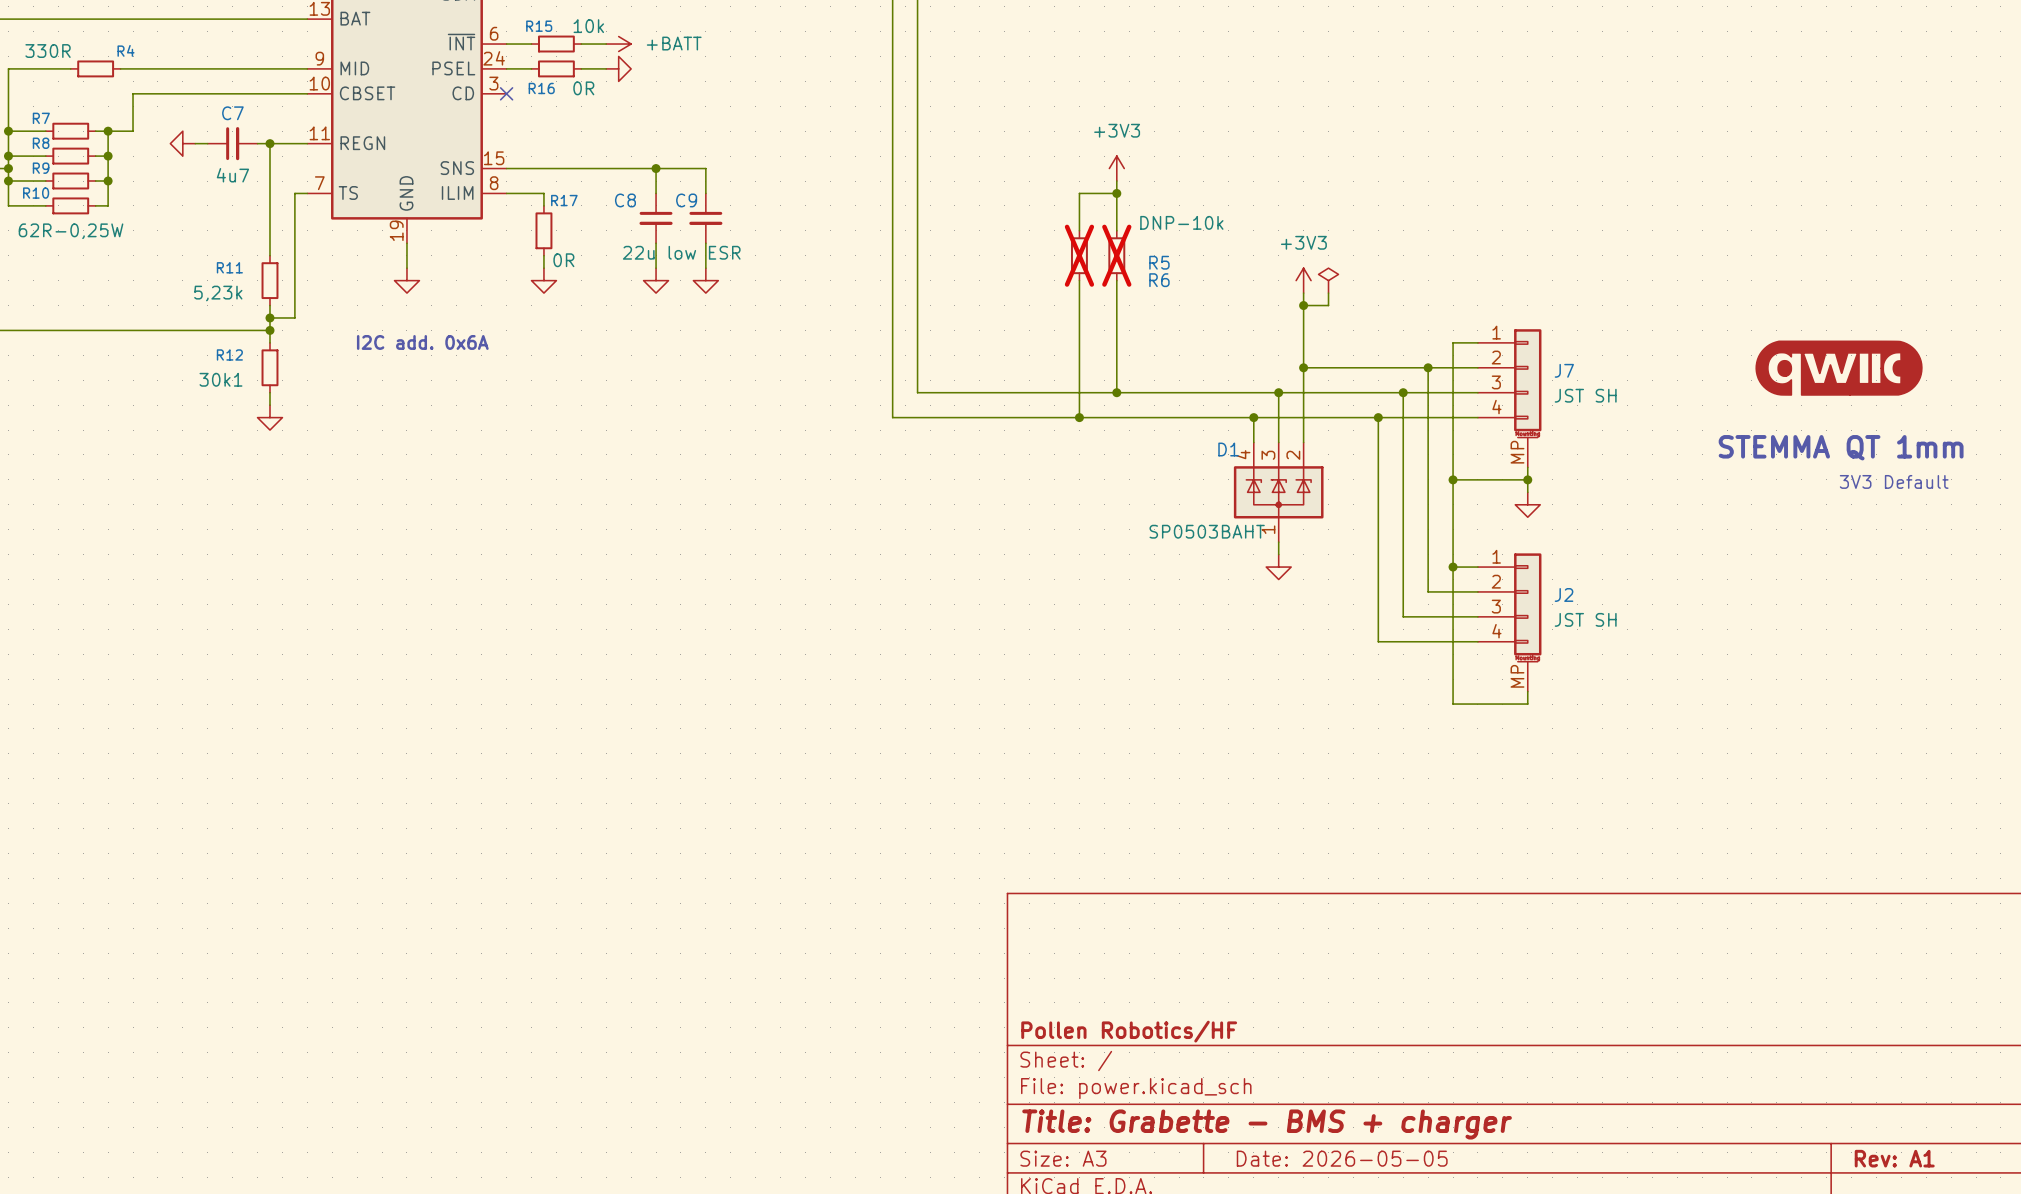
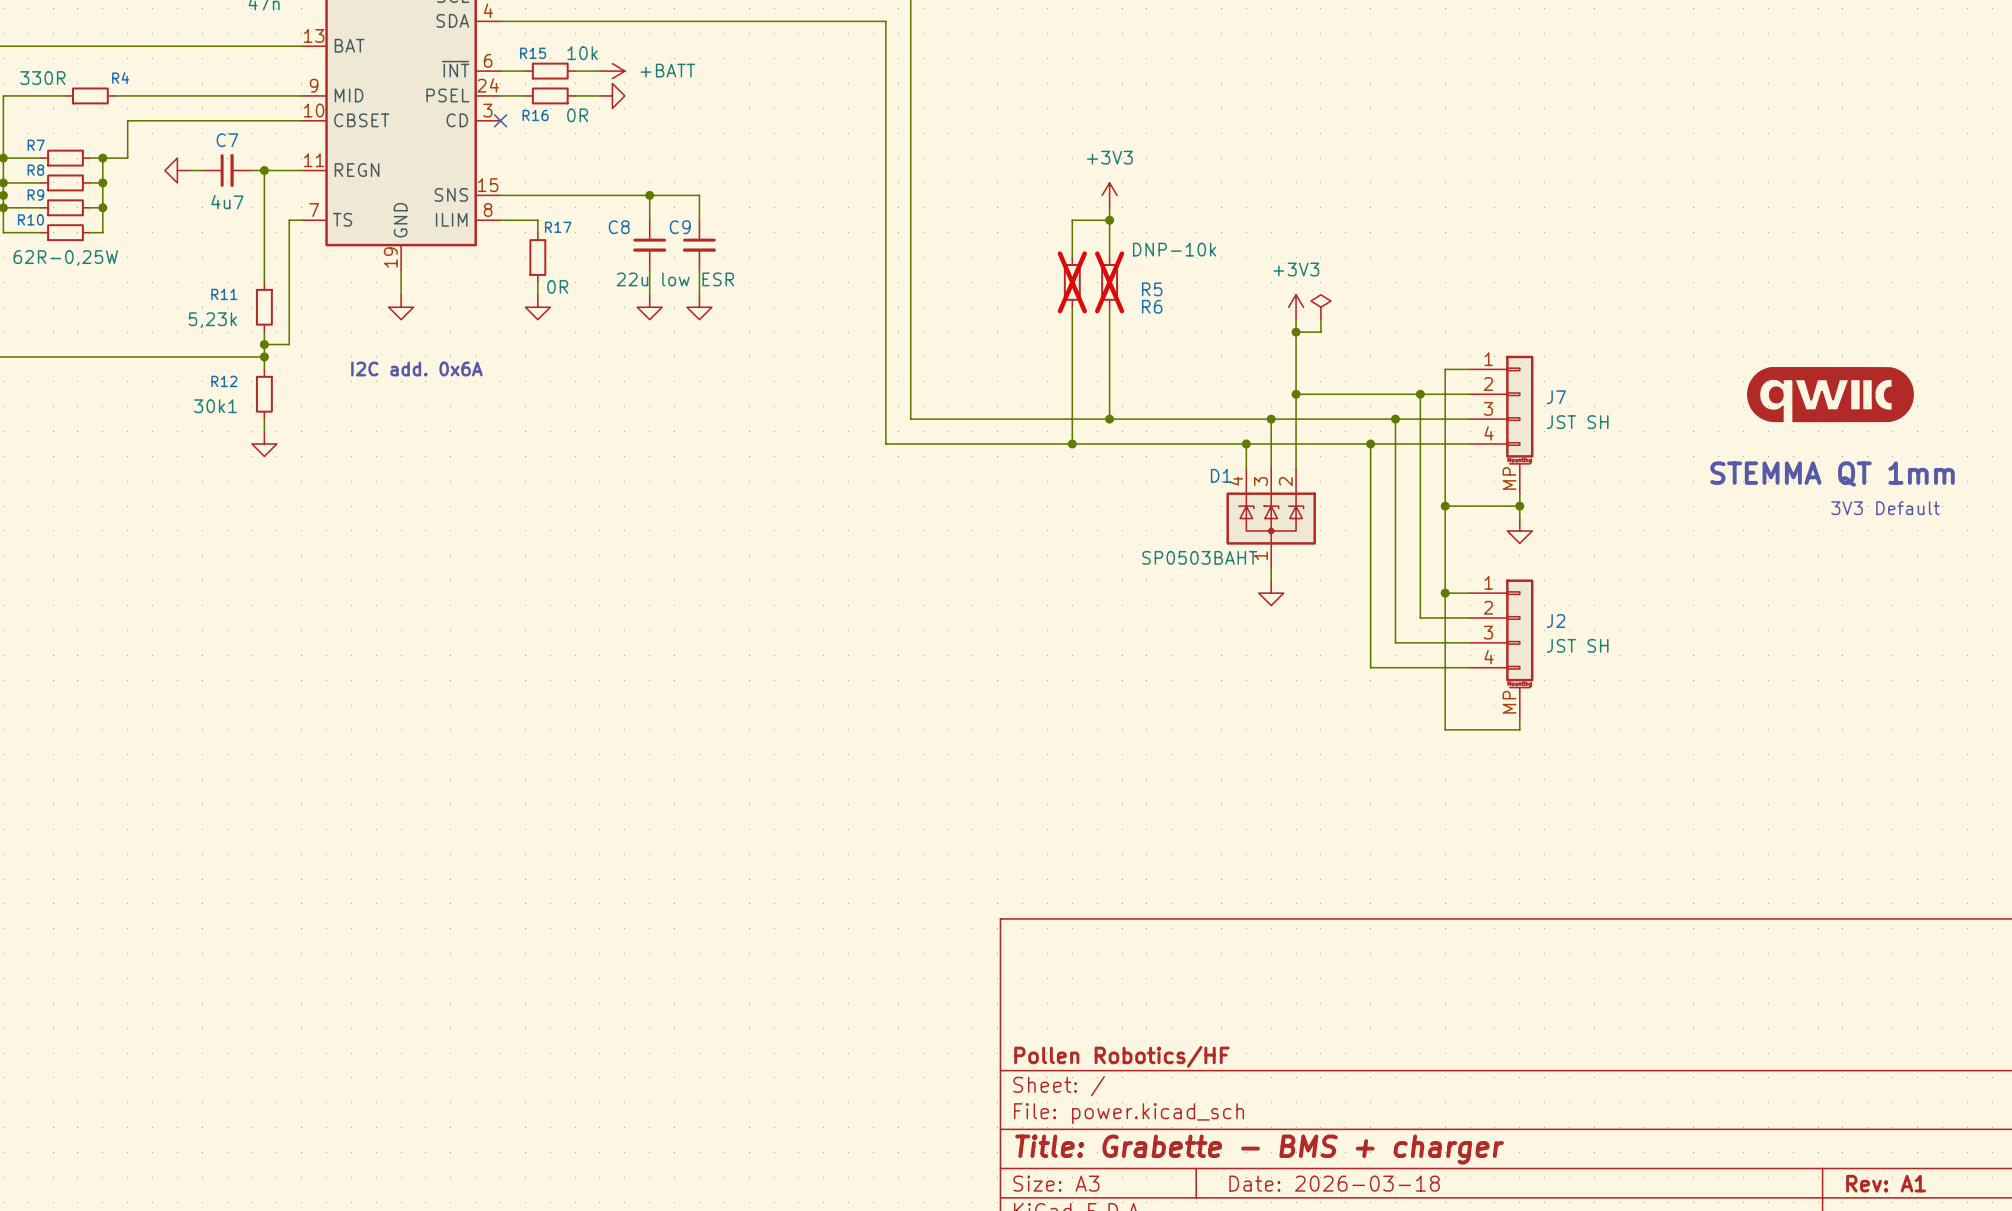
title block: Date: 2026-05-05 (1342, 1158) -> Date: 2026-03-18 (1334, 1183)

